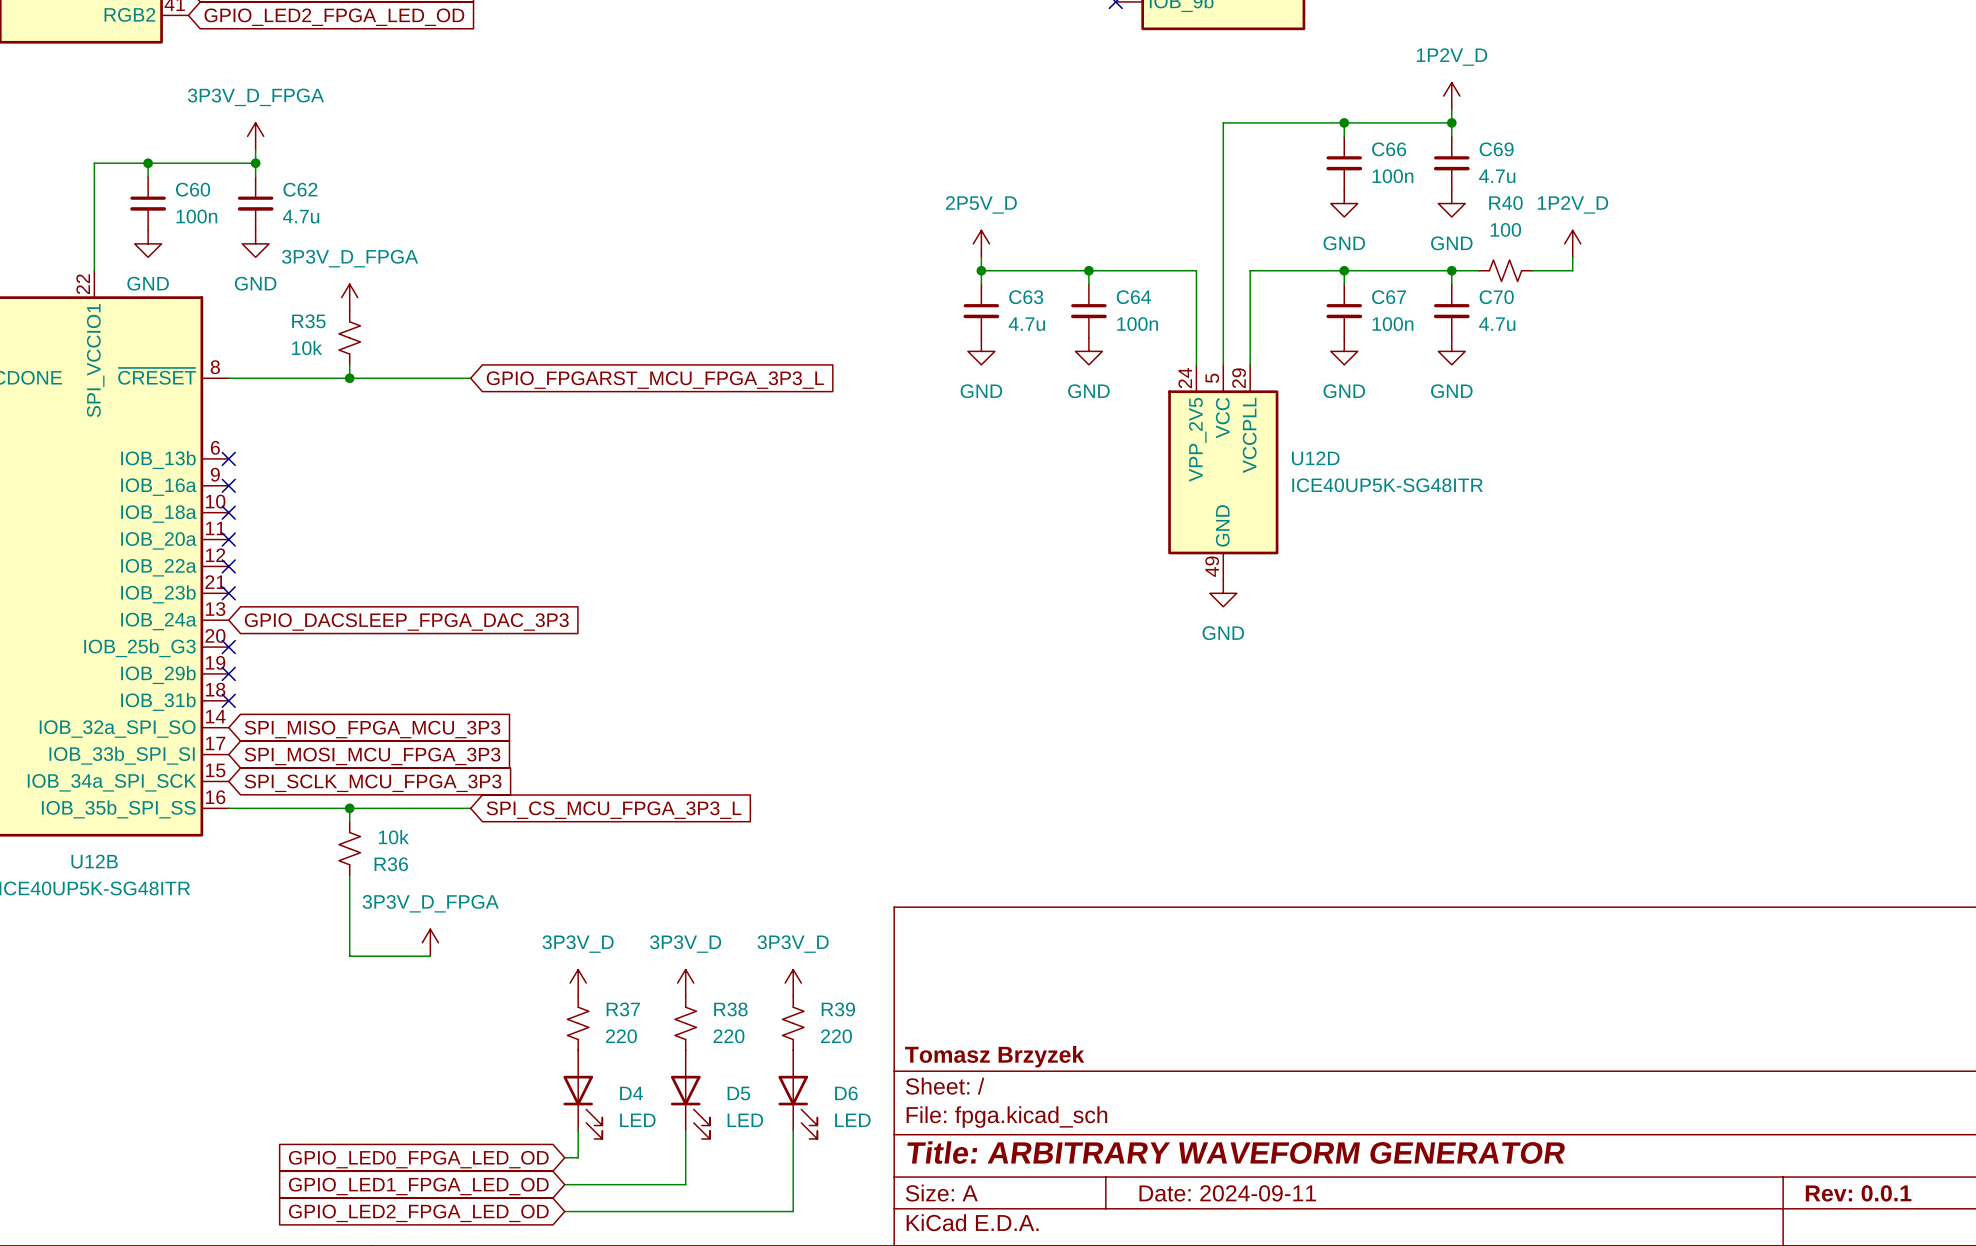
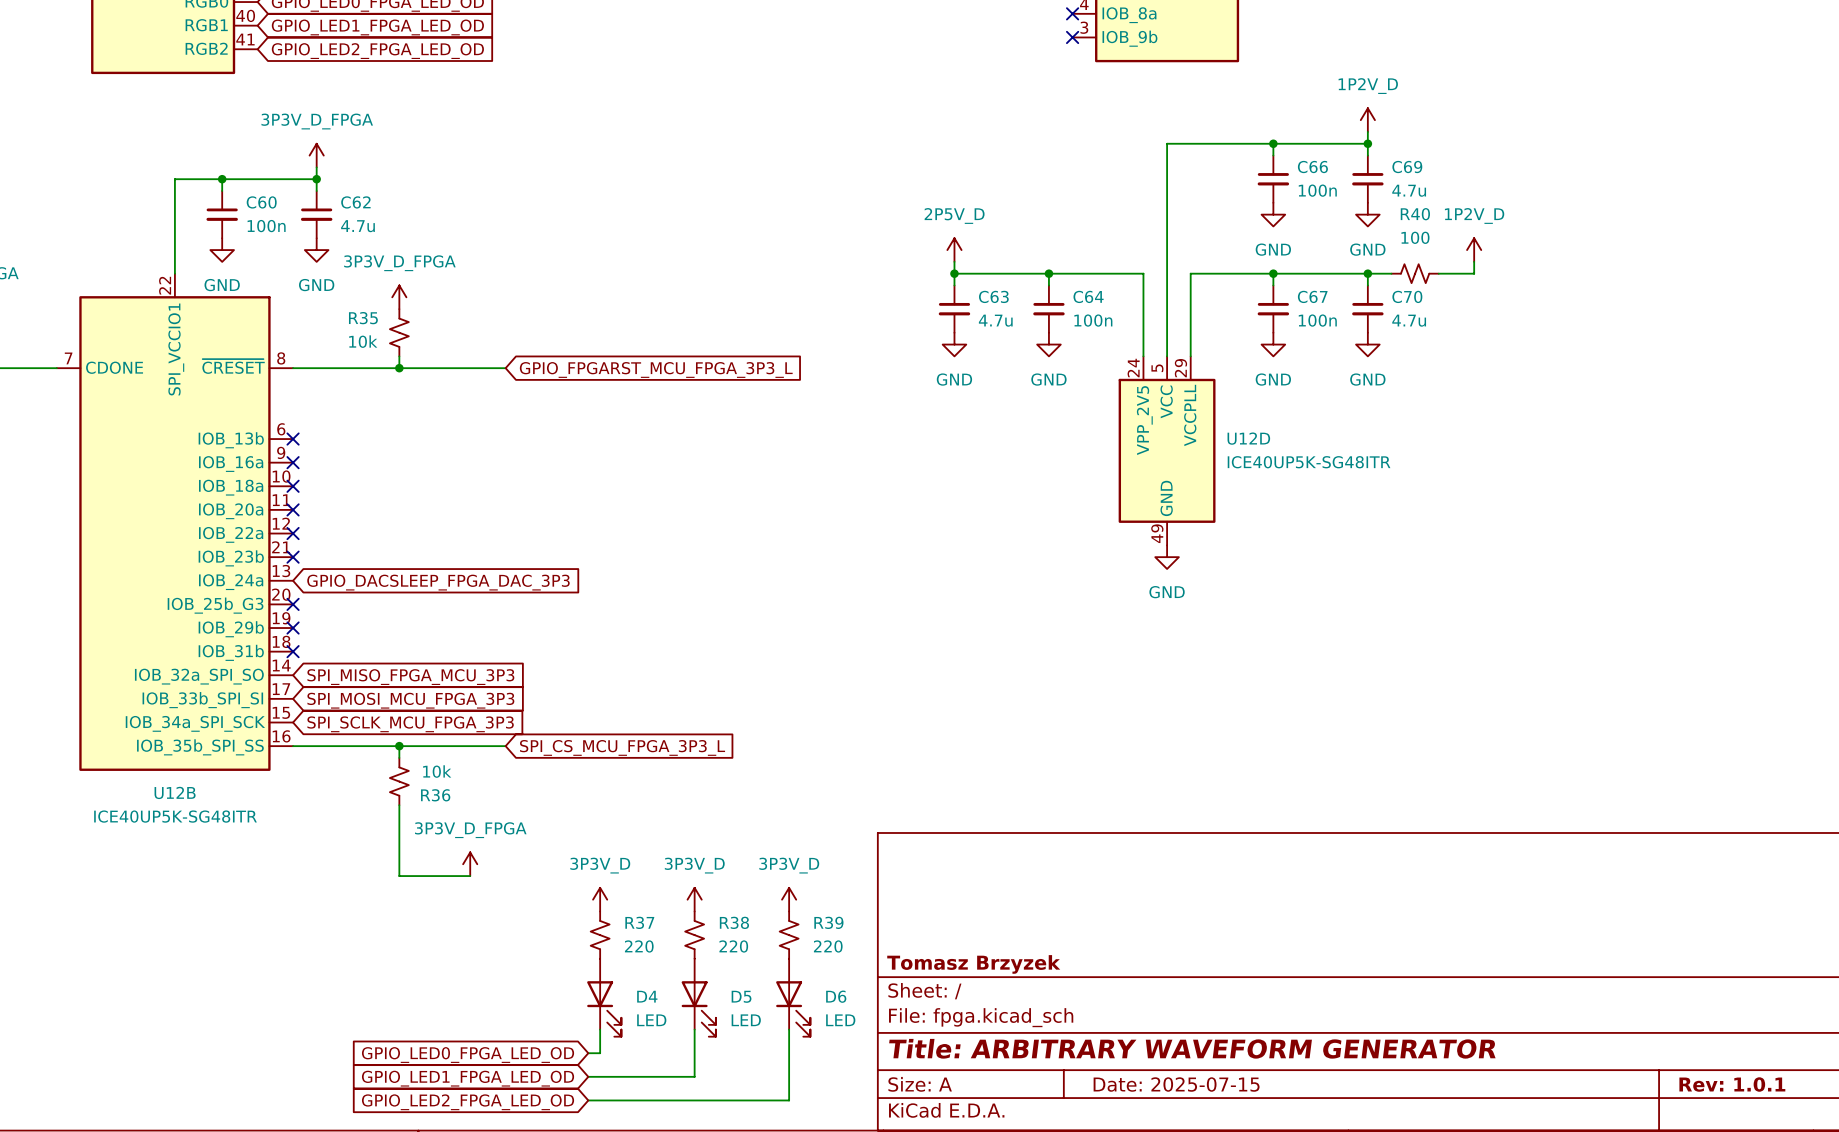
title block: Date: 2024-09-11 (1227, 1193) -> Date: 2025-07-15 (1176, 1084)
title block: Rev: 0.0.1 (1858, 1193) -> Rev: 1.0.1 (1732, 1084)

